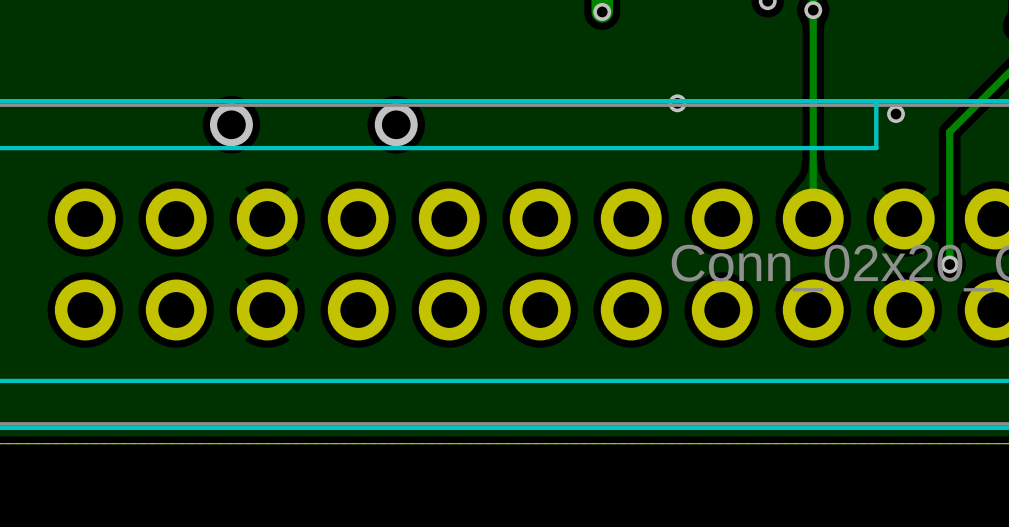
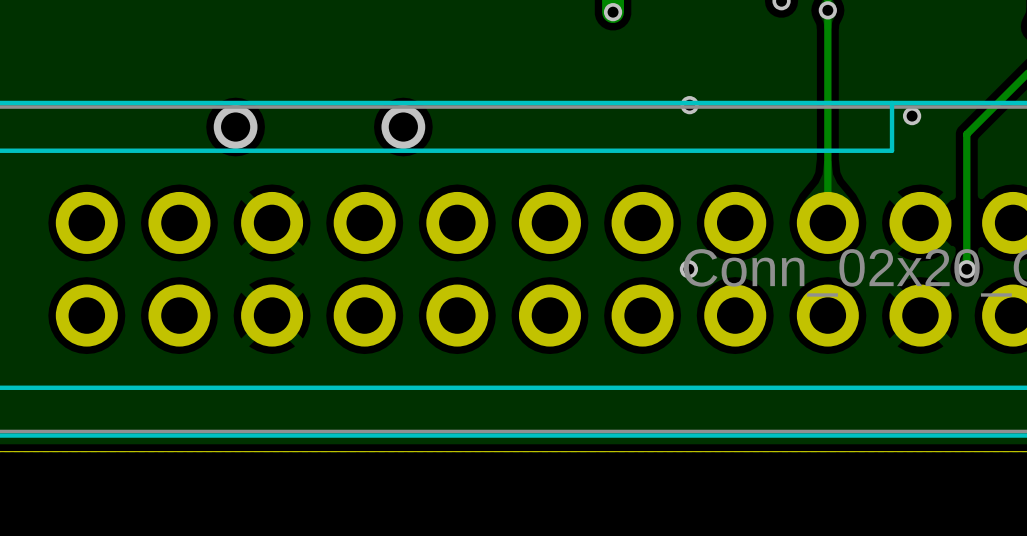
via: none -> (688, 269)

